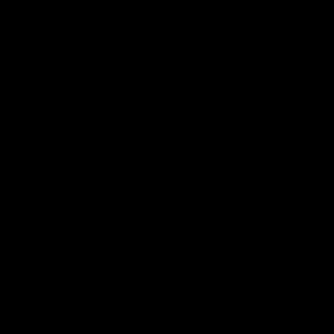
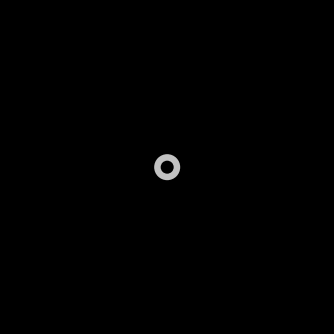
via: none -> (167, 167)

